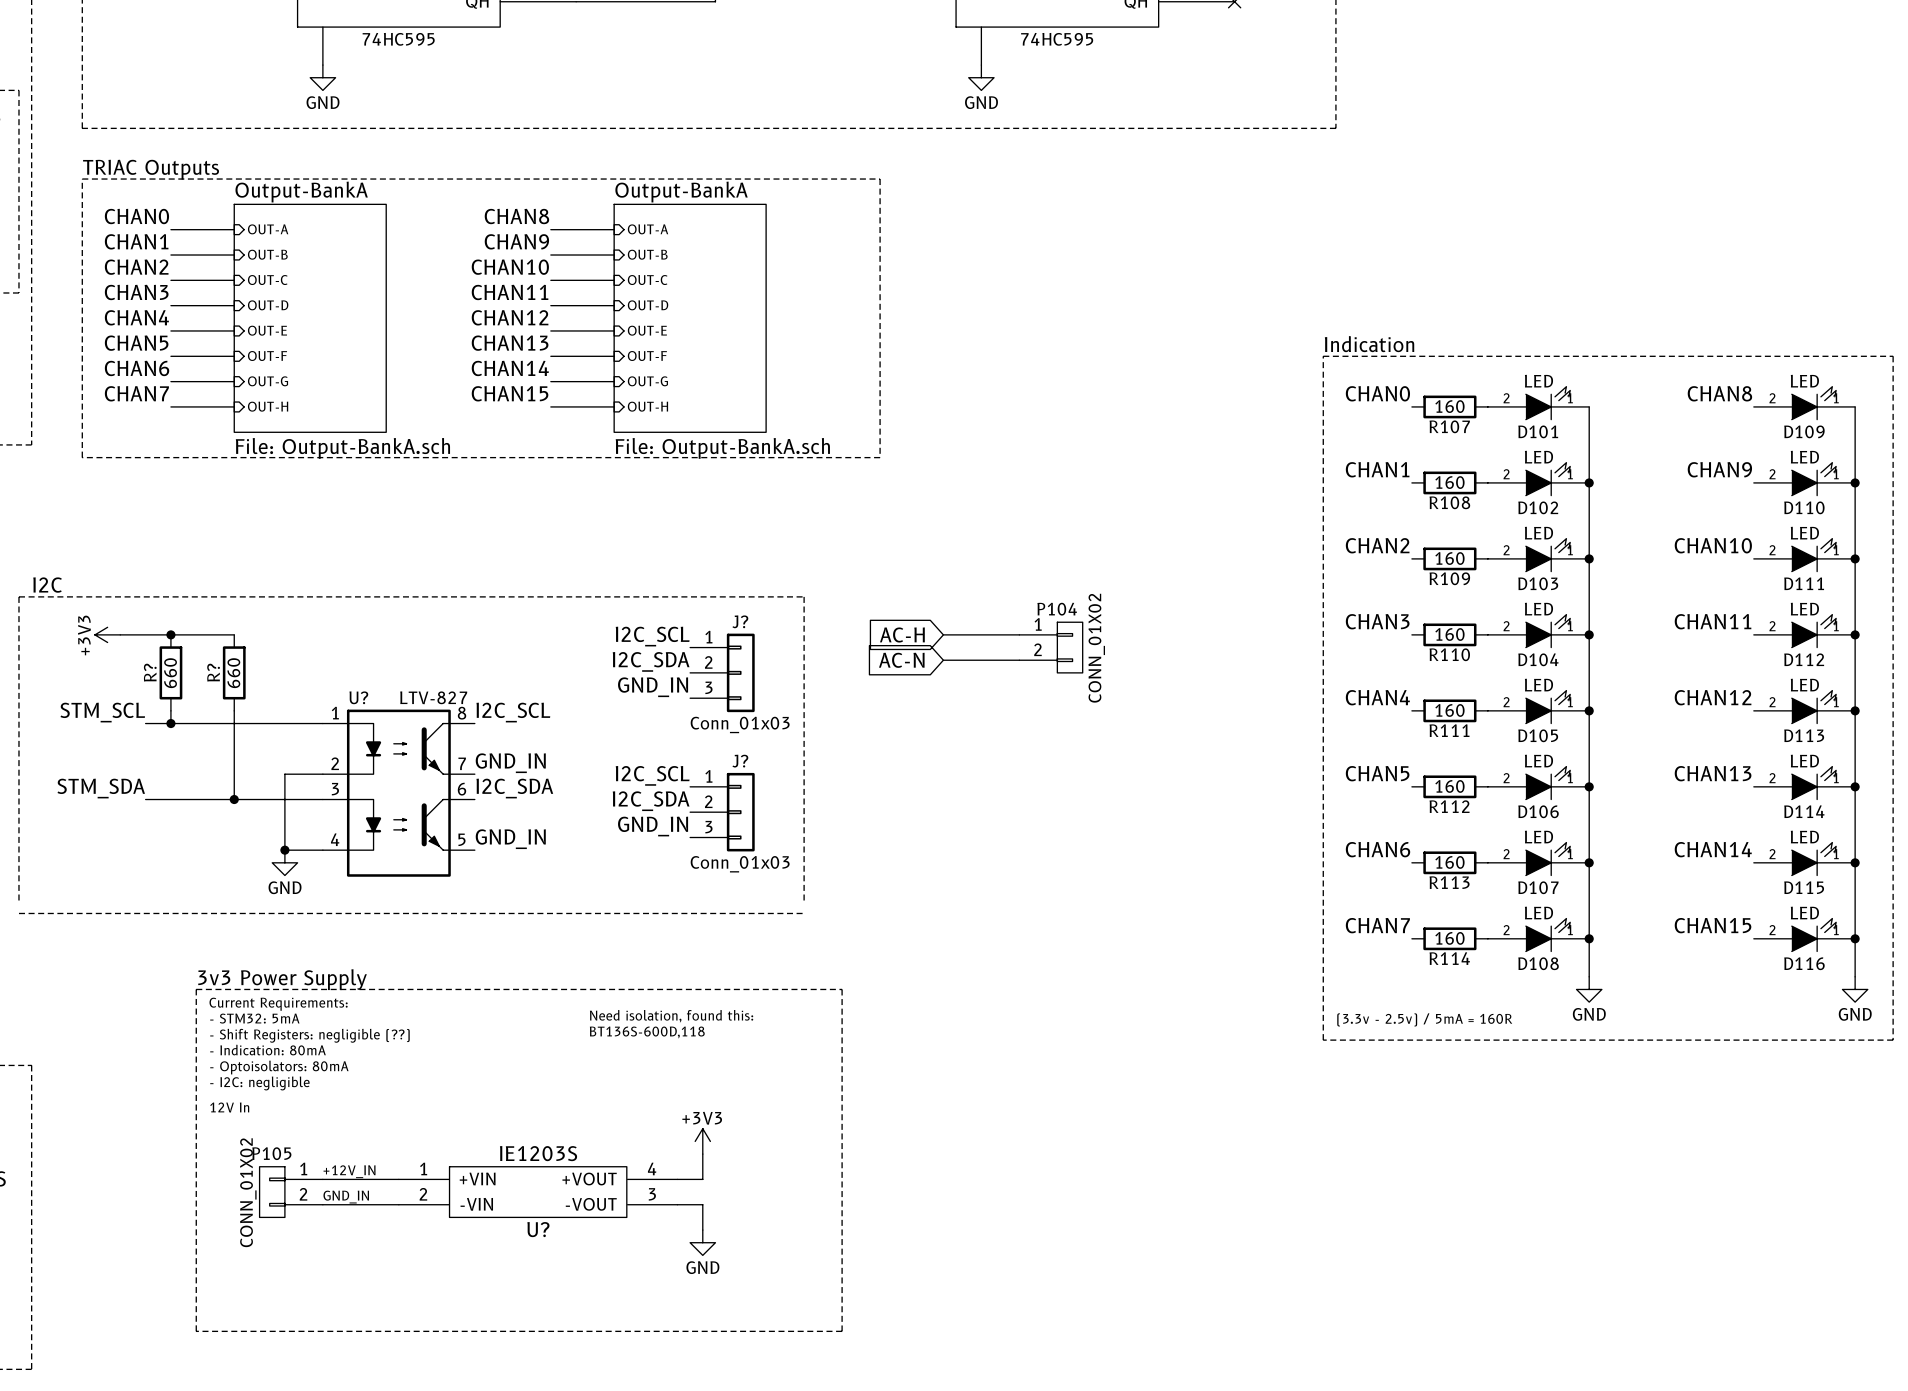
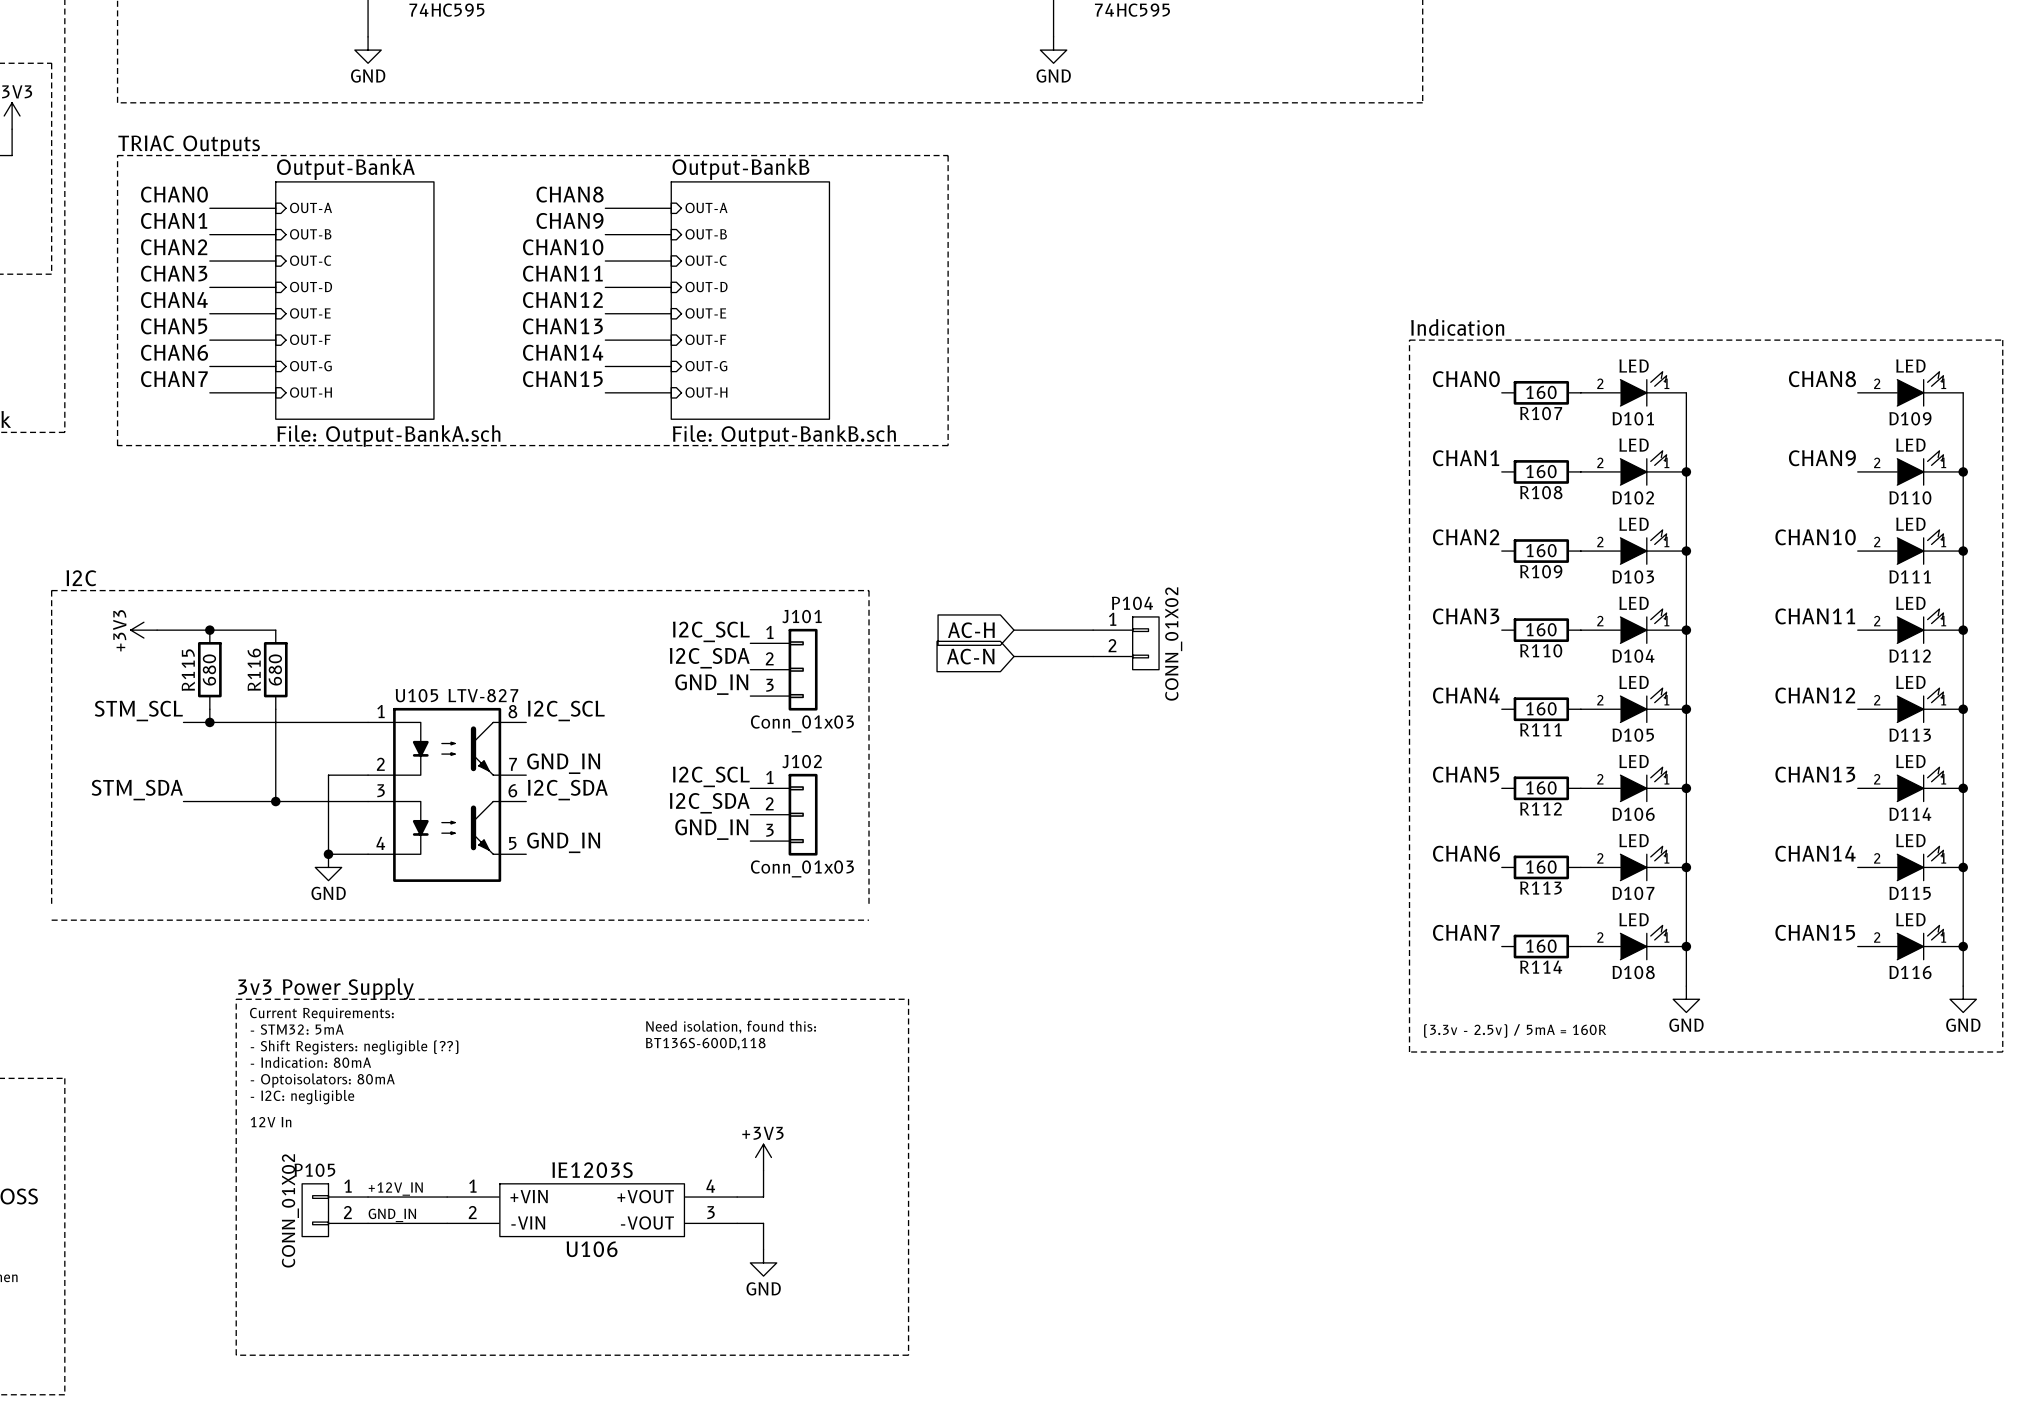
sheet Output-BankA name: Output-BankA (681, 192) -> Output-BankB (740, 169)
sheet Output-BankA value: File: Output-BankA.sch (722, 448) -> File: Output-BankB.sch (784, 436)
J? name: J? (740, 621) -> J101 (802, 616)
R? name: R? (150, 672) -> R115 (188, 670)
R? name: R? (213, 672) -> R116 (254, 669)
R? value: 660 (170, 673) -> 680 (209, 669)
R? value: 660 (233, 673) -> 680 (275, 669)
U? name: U? (358, 697) -> U105 (416, 695)
J? name: J? (740, 761) -> J102 (802, 761)
U? name: U? (538, 1229) -> U106 (592, 1249)

